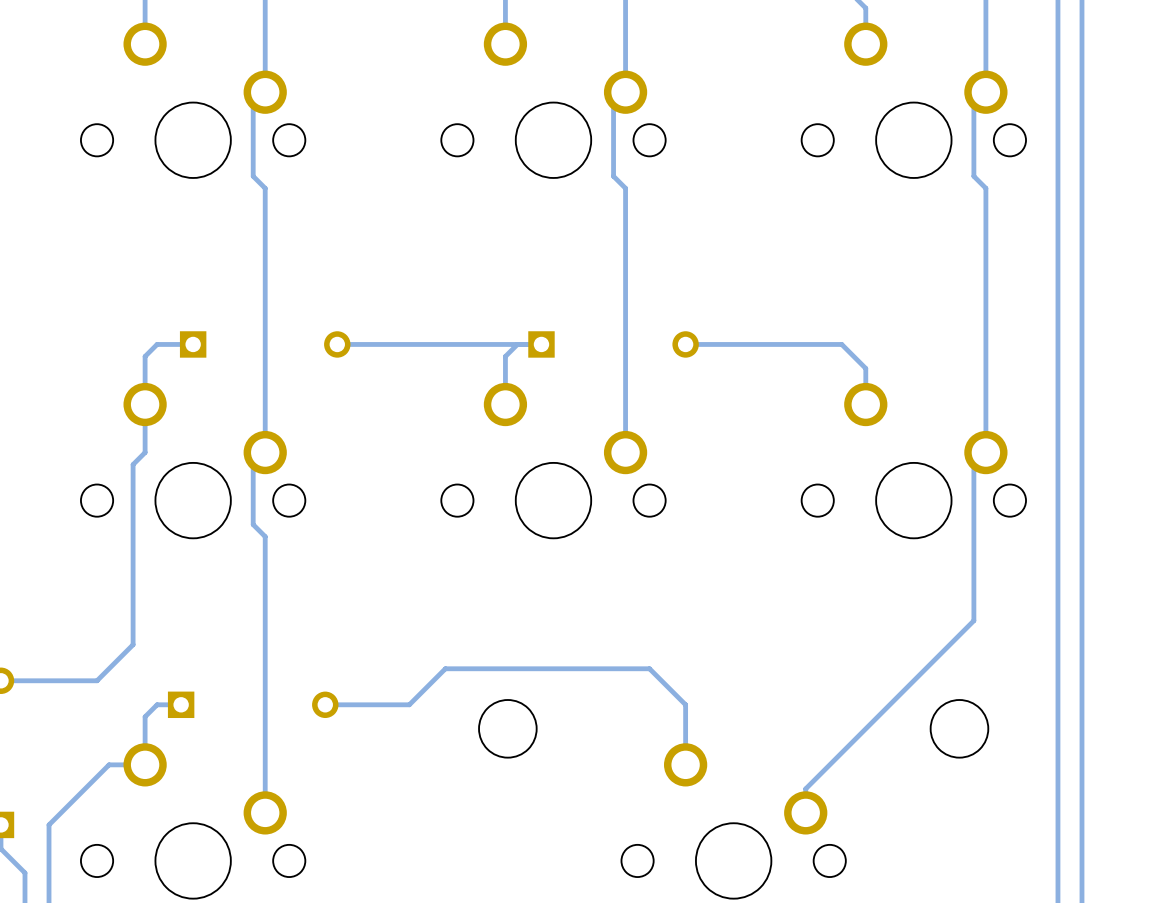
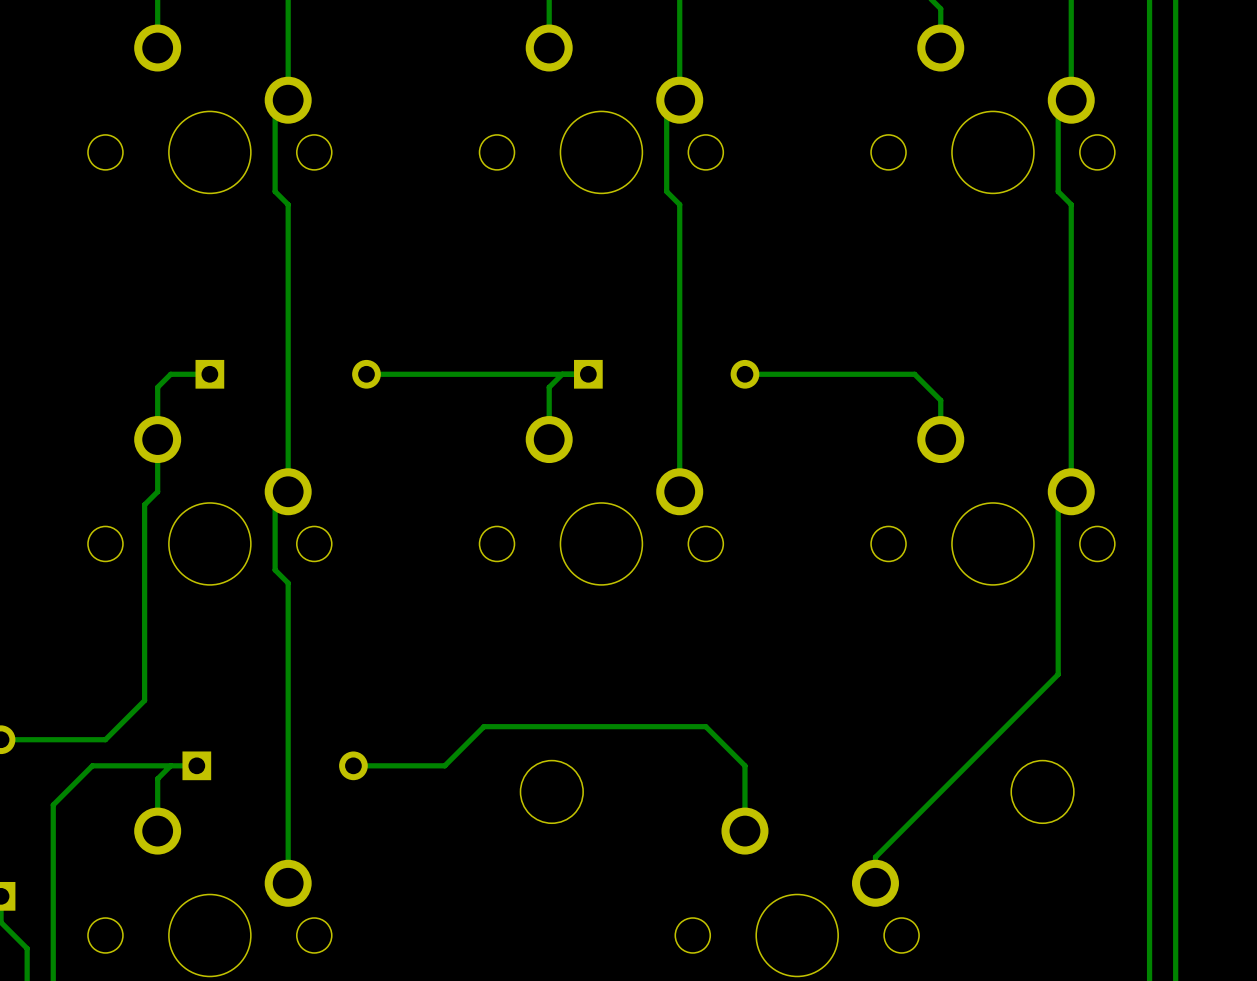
track: (145, 764) (109, 764) (49, 824) -> (170, 765) (92, 765) (53, 804) (53, 896)

